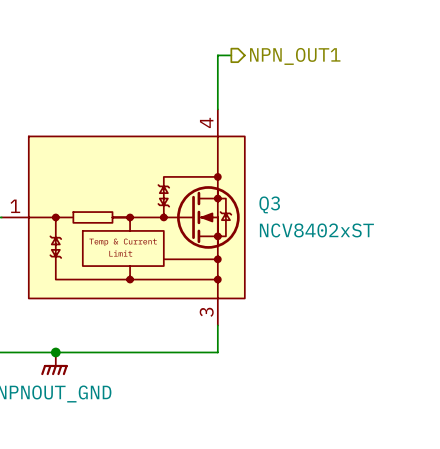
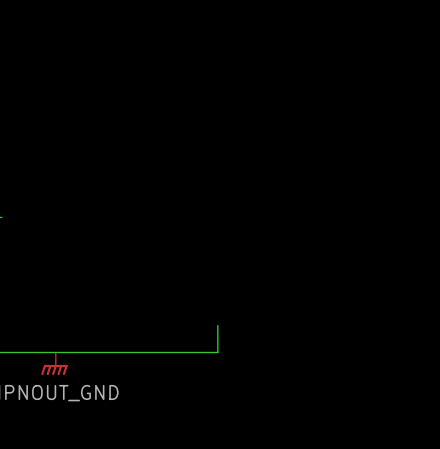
wire: (231, 55) (217, 55) (217, 109) -> none
hierarchical label: NPN_OUT1 (295, 56) -> none
Q3: NCV8402xST (123, 217) -> none
junction: (55, 352) -> none

